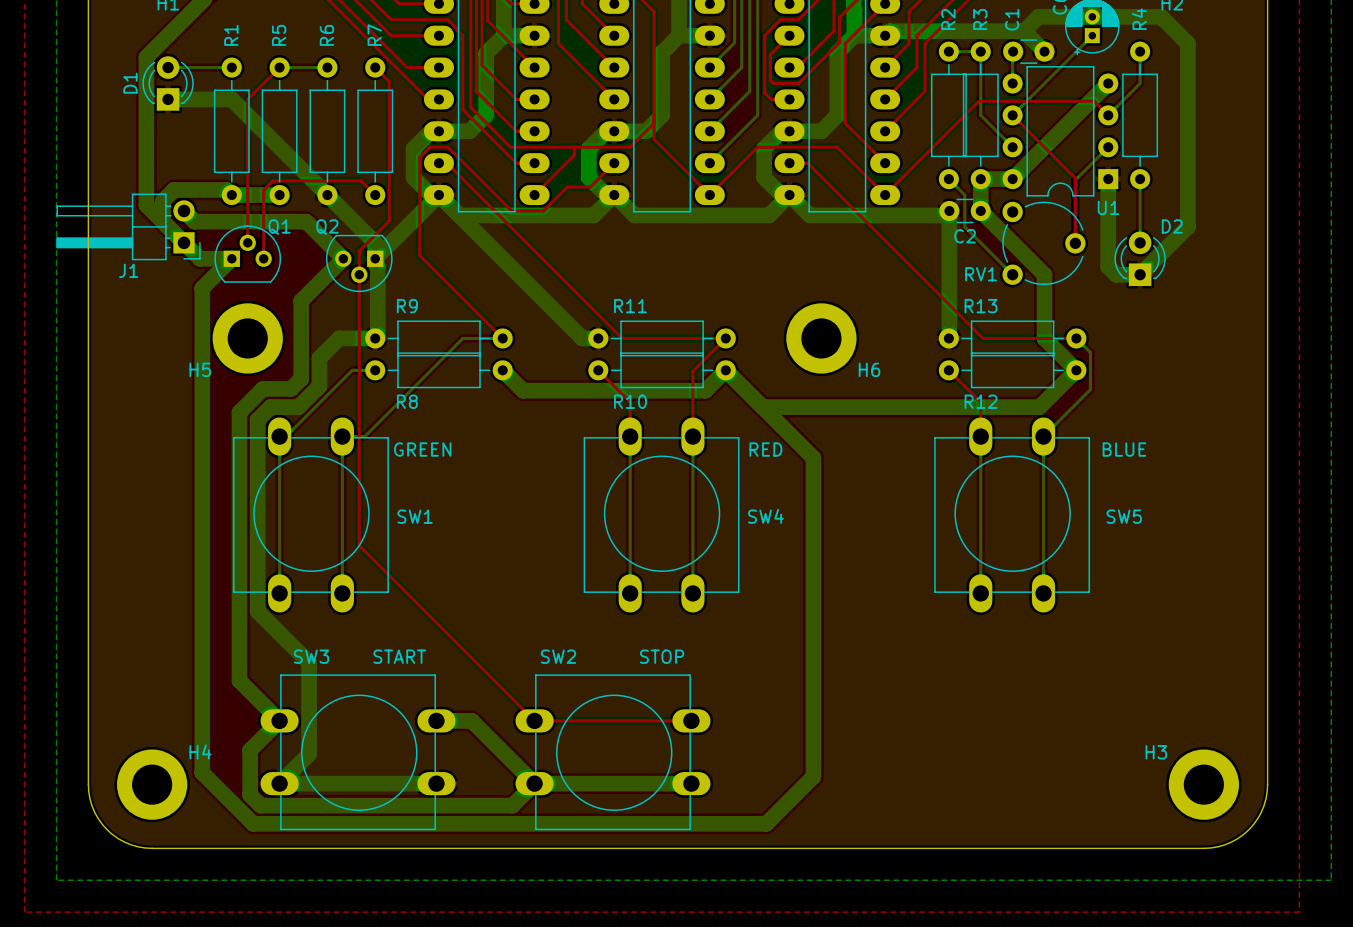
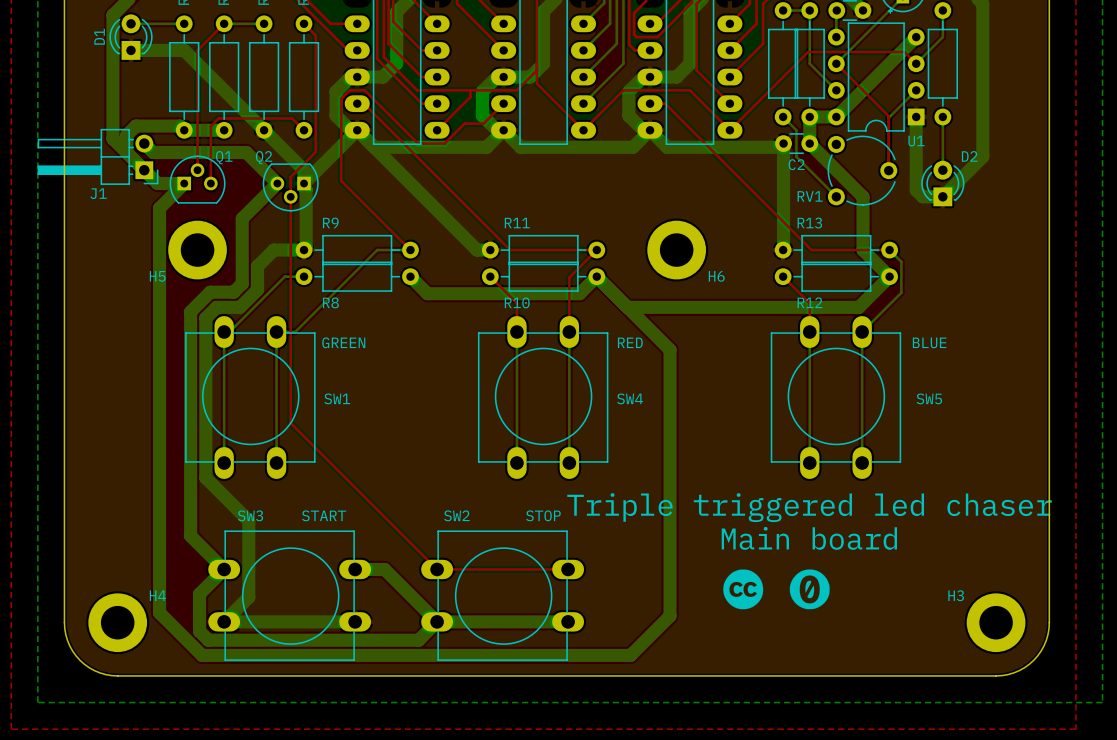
text: none -> Triple triggered led chaser (809, 507)
text: none -> Main board (809, 538)
drawing: none -> [723, 569, 764, 610]
drawing: none -> [789, 569, 830, 610]

